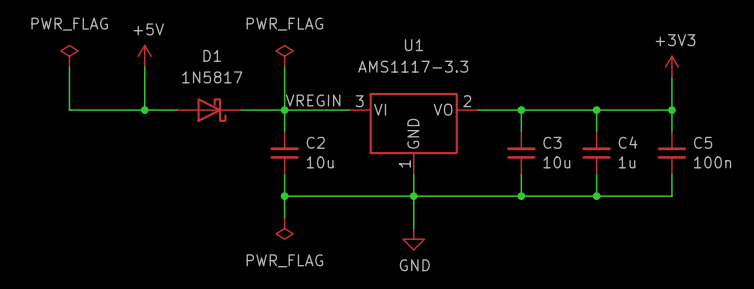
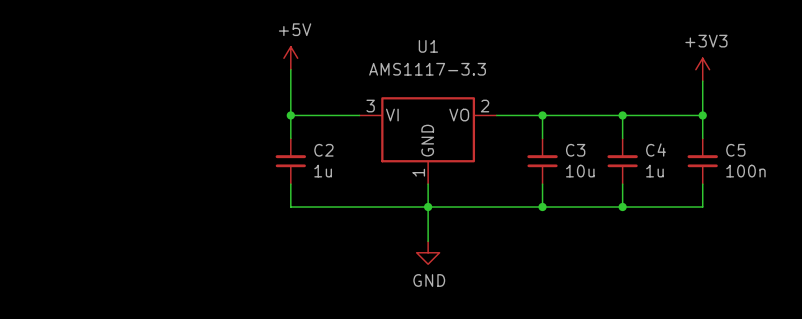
power symbol: PWR_FLAG (69, 56) -> none
power symbol: +5V (144, 56) -> none
power symbol: PWR_FLAG (284, 56) -> +5V (290, 58)
wire: (69, 67) (69, 110) (177, 110) -> none
wire: (144, 67) (144, 110) -> none
label: VREGIN (313, 100) -> none
junction: (144, 110) -> none
D1: 1N5817 (209, 110) -> none
wire: (241, 110) (284, 110) -> none
C2 value: 10u (320, 162) -> 1u (323, 171)
wire: (284, 196) (284, 217) -> none
junction: (284, 196) -> none
power symbol: PWR_FLAG (284, 228) -> none

